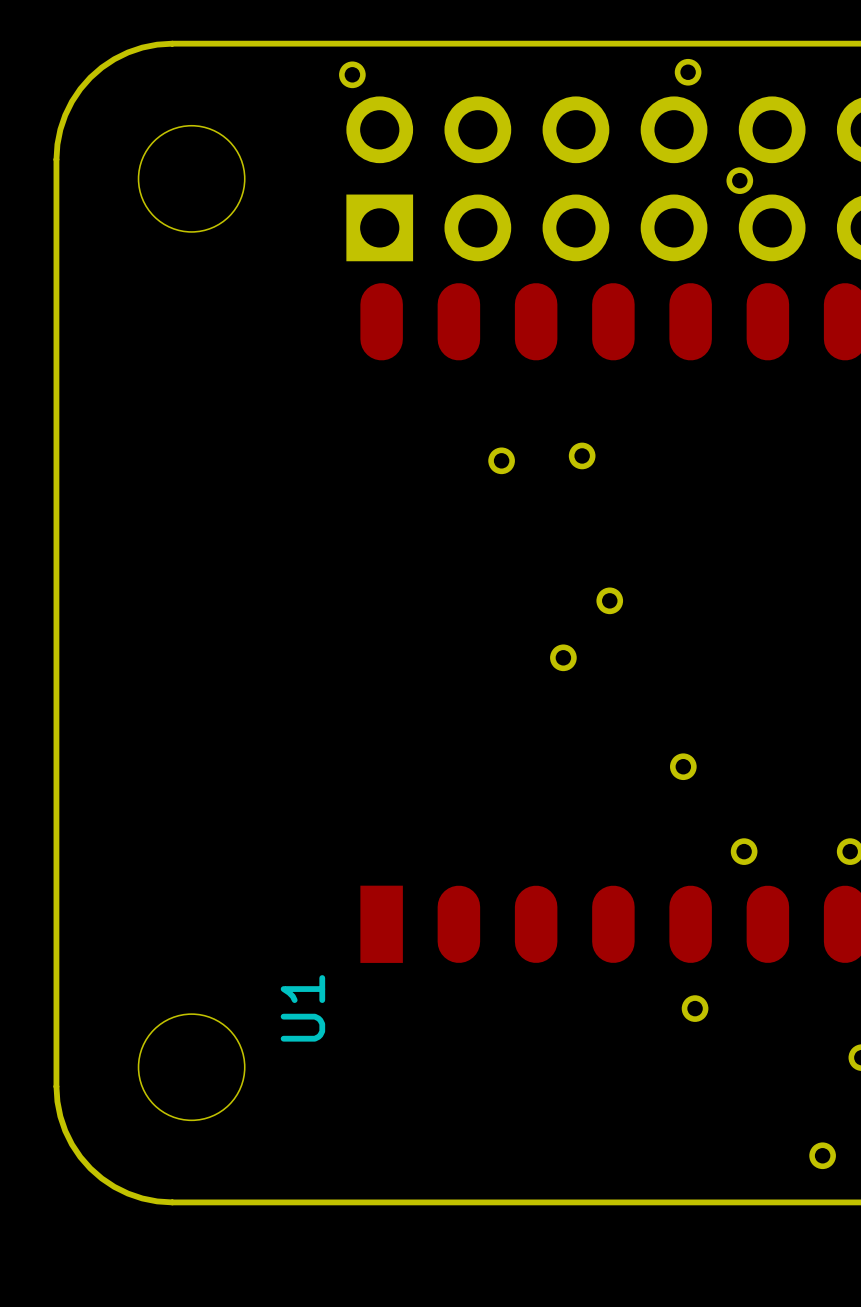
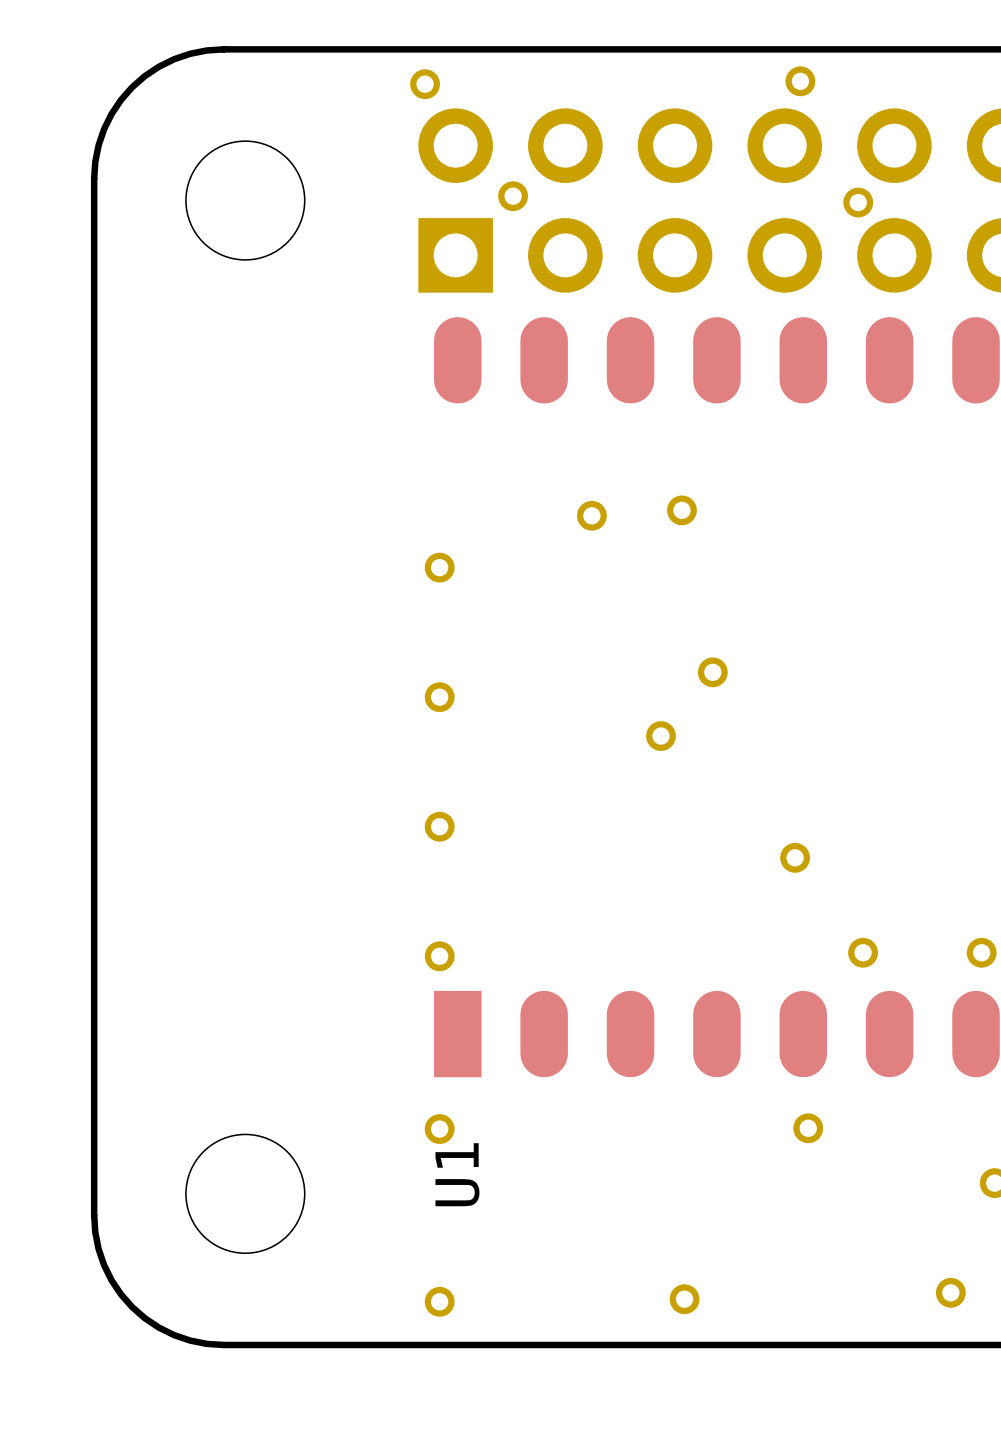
part: none -> (513, 196)
part: none -> (439, 567)
part: none -> (439, 697)
part: none -> (439, 826)
part: none -> (439, 956)
U1 name position: U1 (302, 1008) -> U1 (457, 1174)
part: none -> (439, 1129)
part: none -> (684, 1299)
part: none -> (439, 1301)

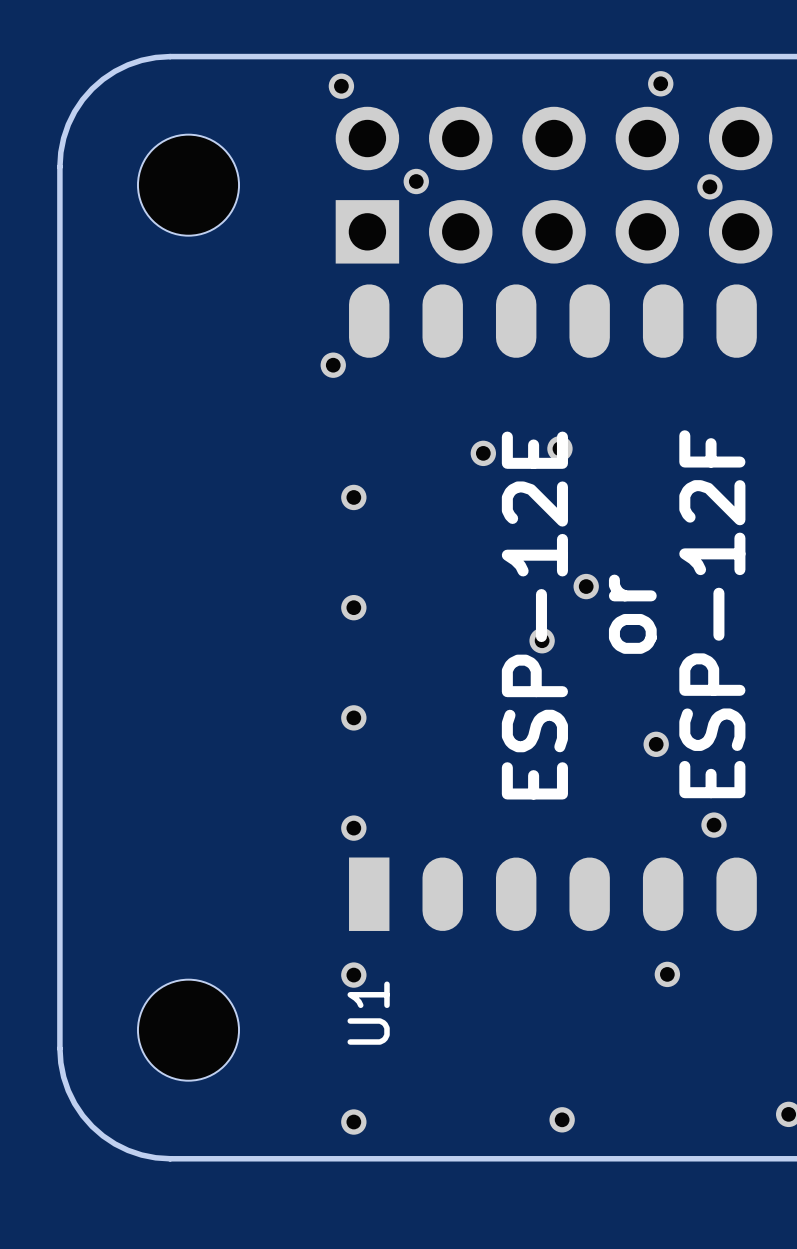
part: none -> (333, 365)
text: none -> ESP-12E (534, 615)
text: none -> or (632, 614)
text: none -> ESP-12F (712, 614)

